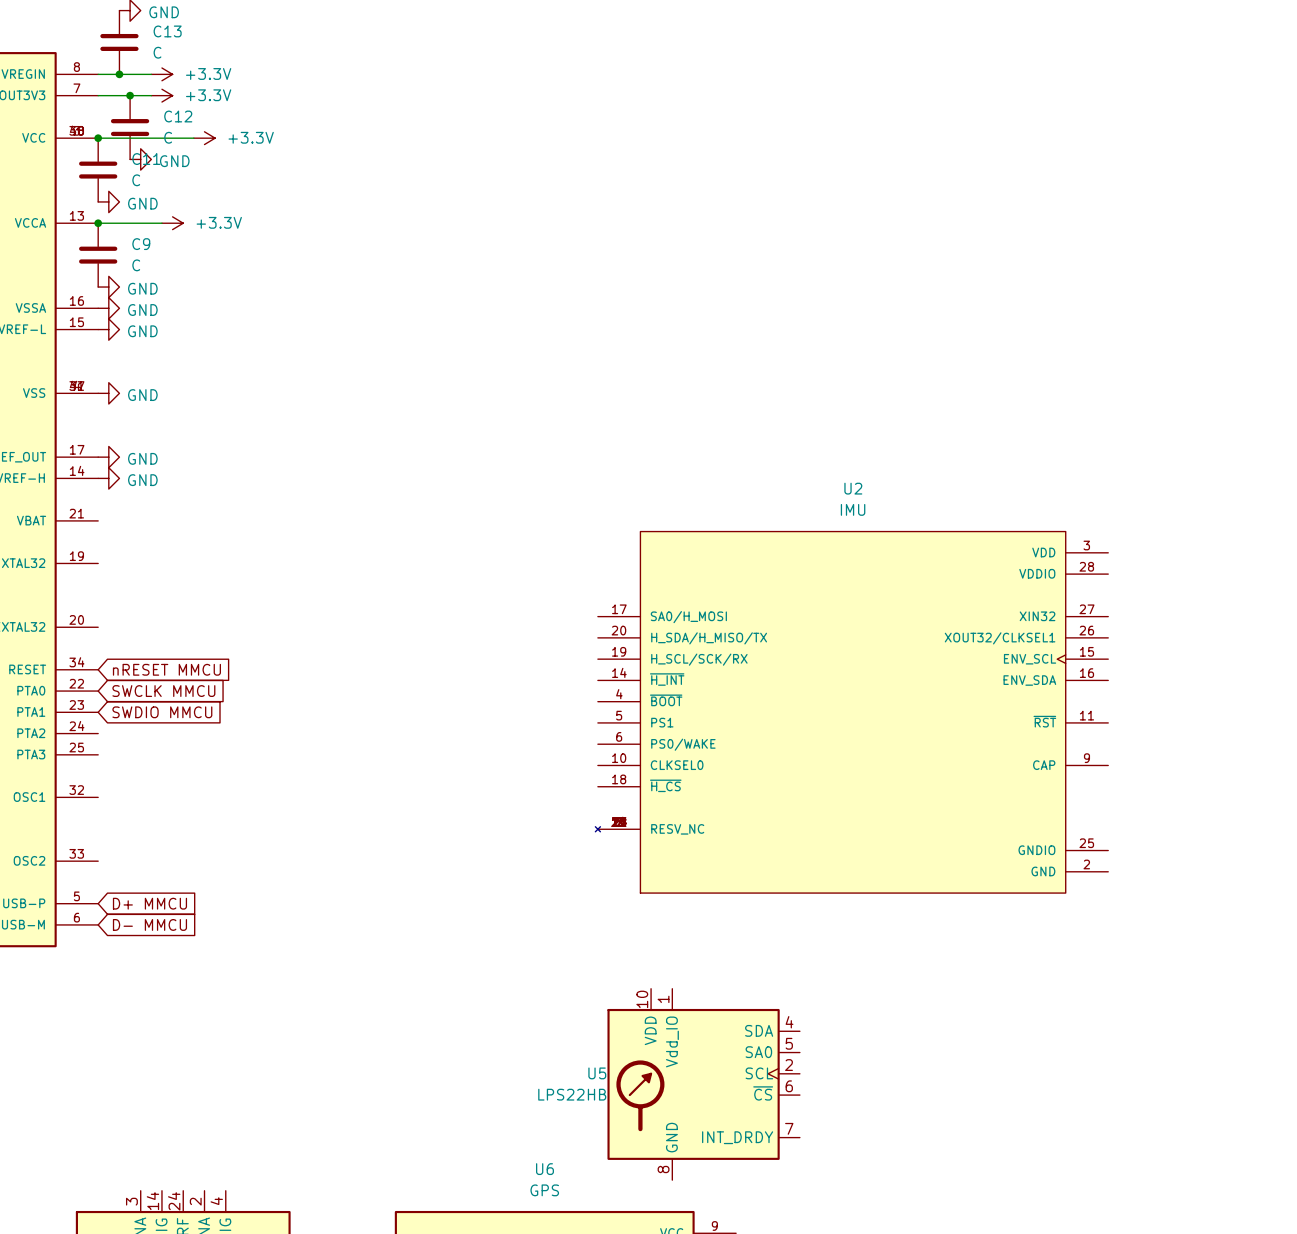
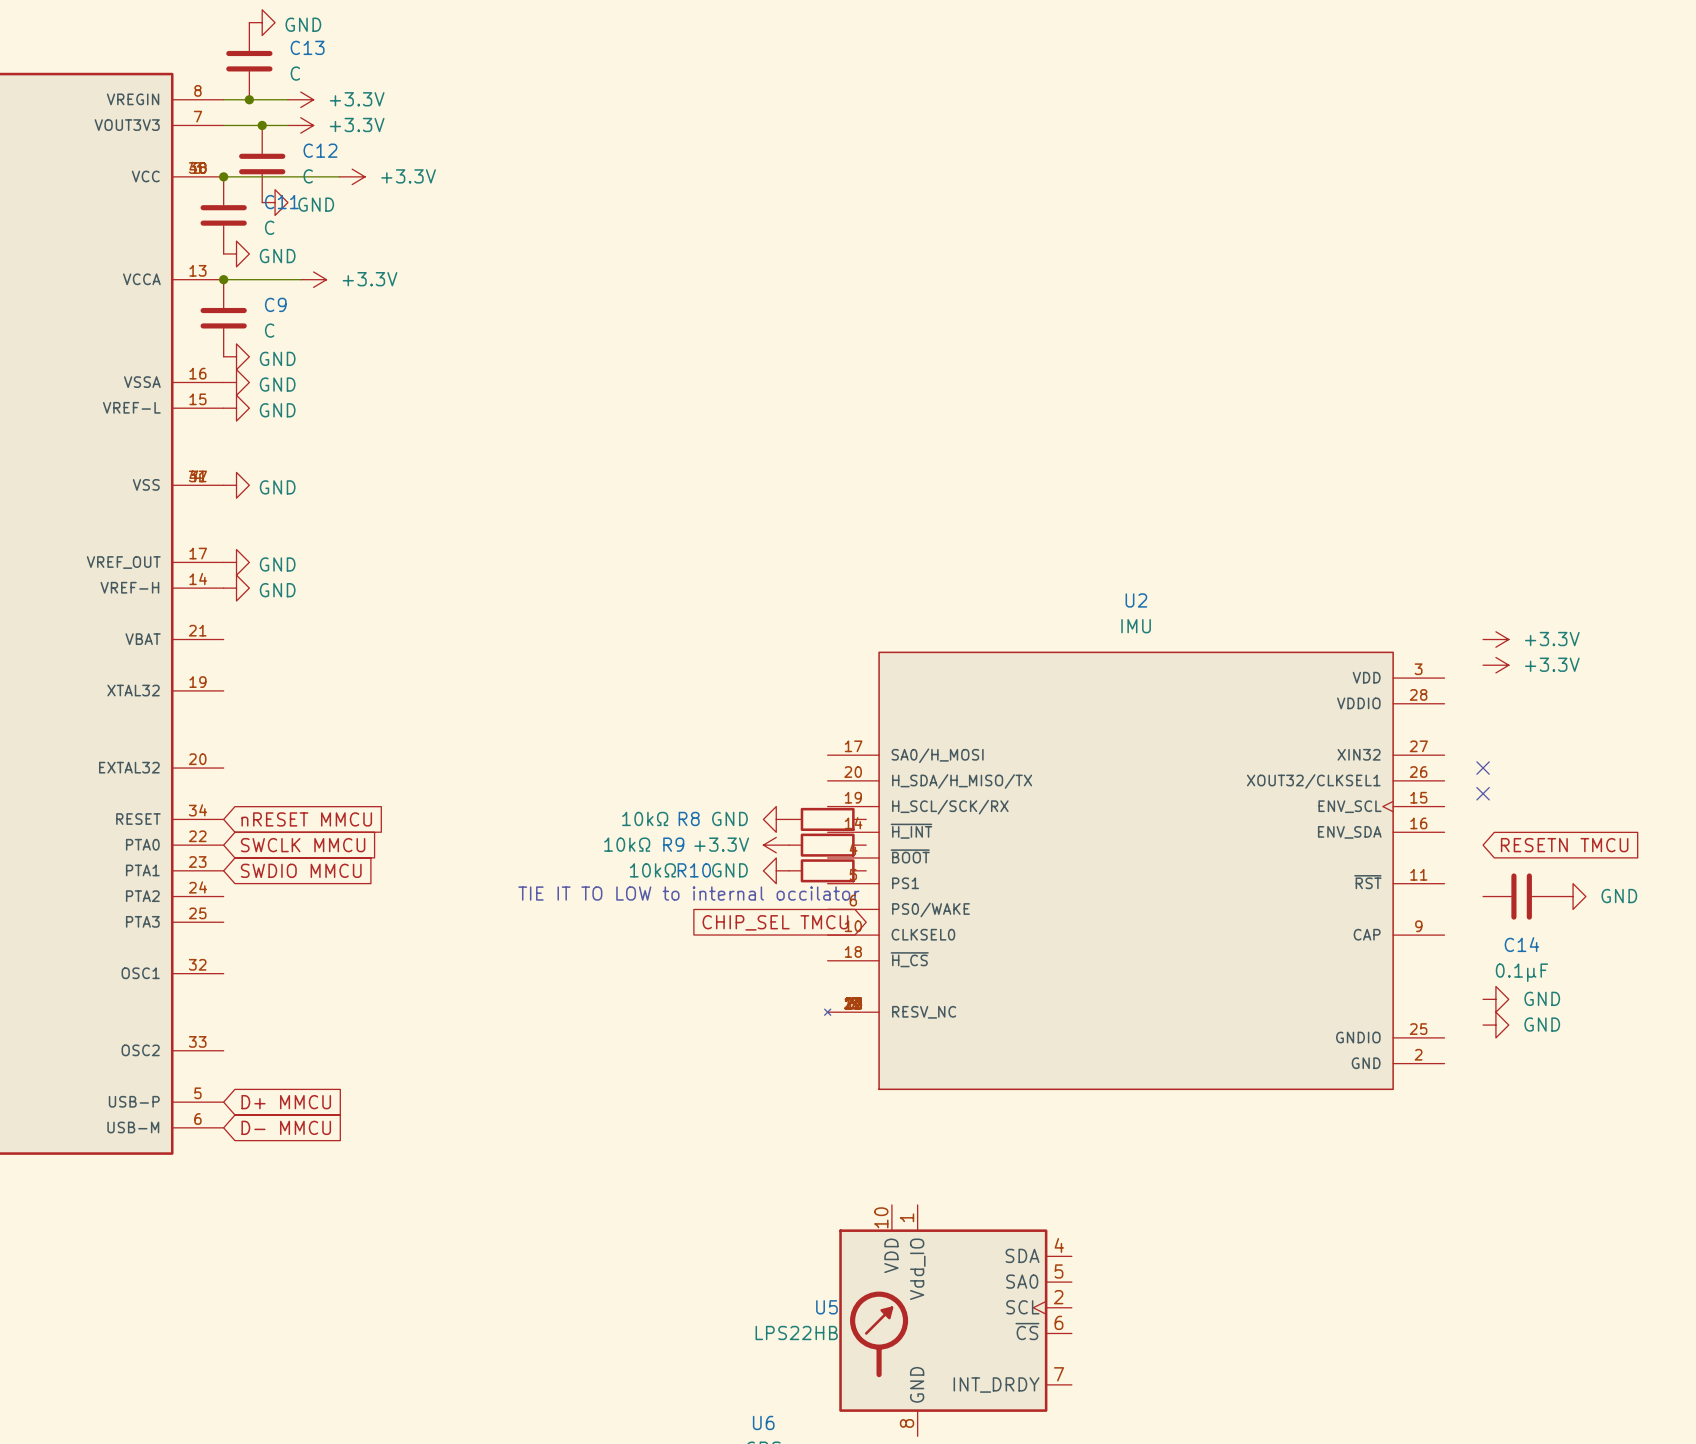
power symbol: none -> +3.3V (1495, 639)
power symbol: none -> +3.3V (1495, 665)
no-connect mark: none -> (1483, 768)
no-connect mark: none -> (1483, 793)
power symbol: none -> GND (776, 819)
R8: none -> 10kΩ (827, 819)
power symbol: none -> +3.3V (776, 845)
R9: none -> 10kΩ (827, 845)
global label: none -> RESETN TMCU (1564, 845)
power symbol: none -> GND (776, 870)
R10: none -> 10kΩ (827, 870)
text: none -> TIE IT TO LOW to internal occilator (688, 893)
C14: none -> 0.1µF (1521, 896)
power symbol: none -> GND (1573, 896)
global label: none -> CHIP_SEL TMCU (775, 922)
power symbol: none -> GND (1495, 999)
power symbol: none -> GND (1495, 1025)

